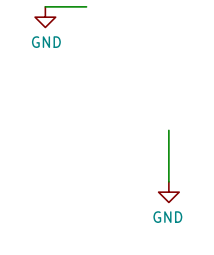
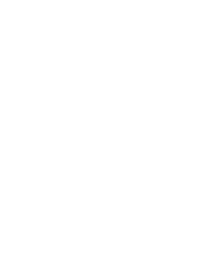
wire: (45, 6) (86, 6) -> none
power symbol: GND (45, 17) -> none
wire: (168, 130) (168, 181) -> none
power symbol: GND (168, 192) -> none

